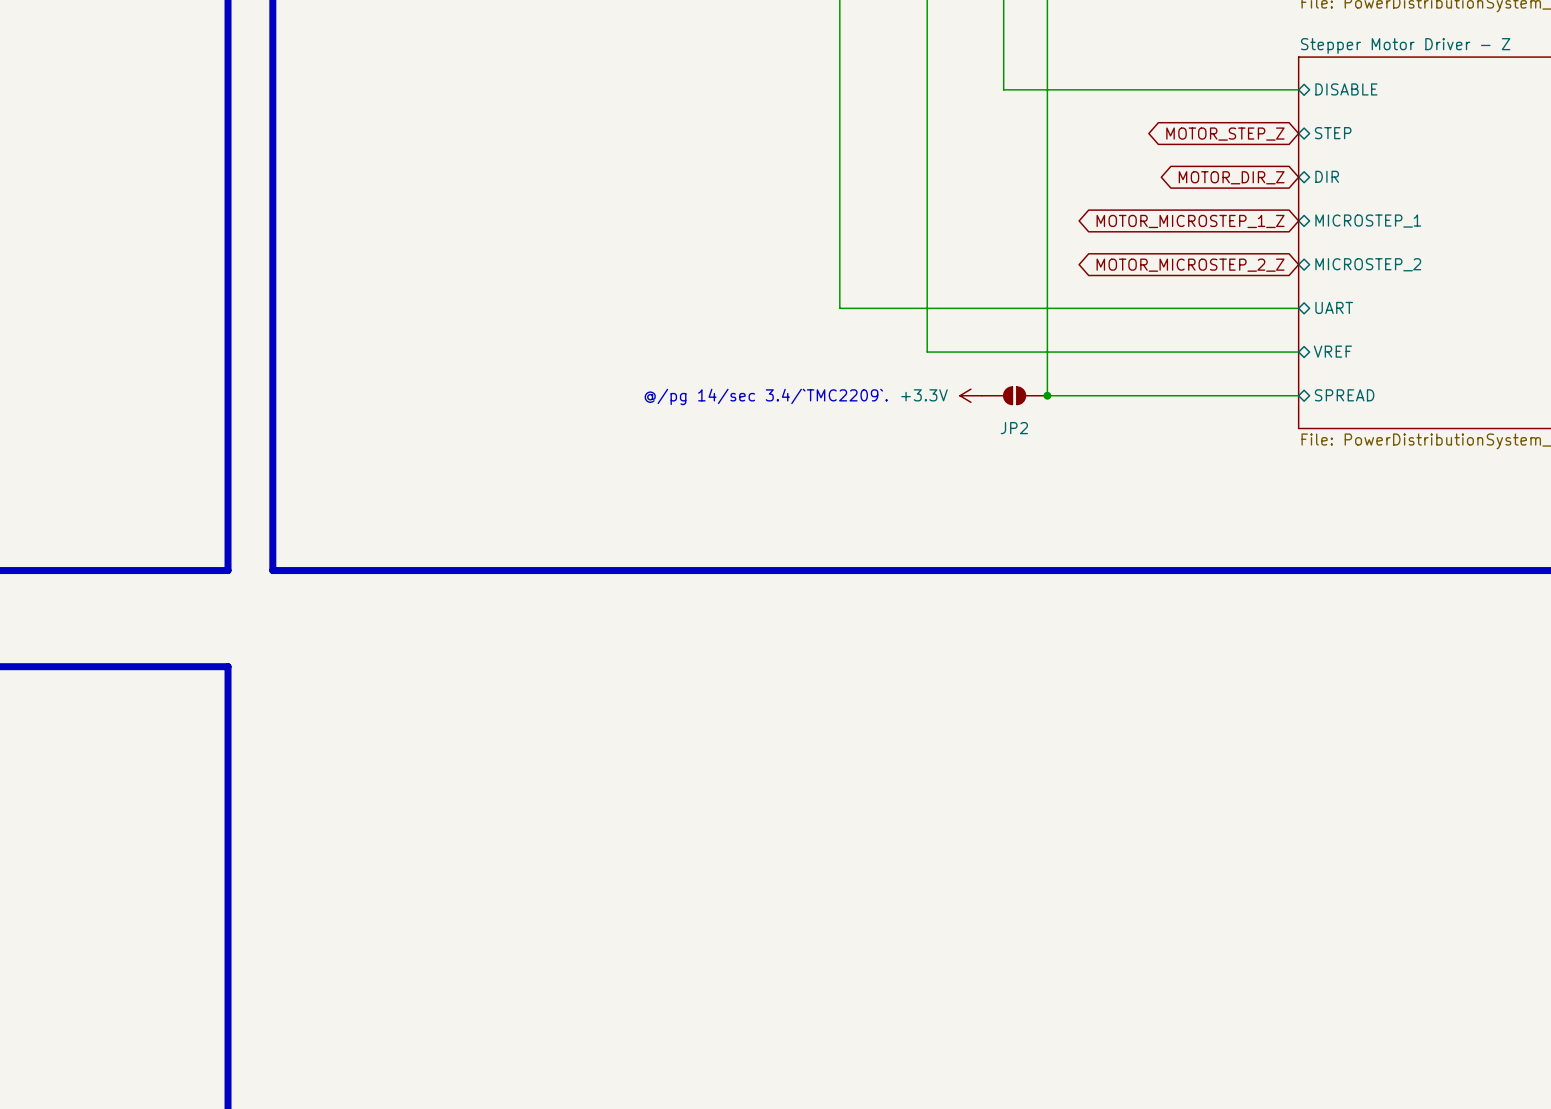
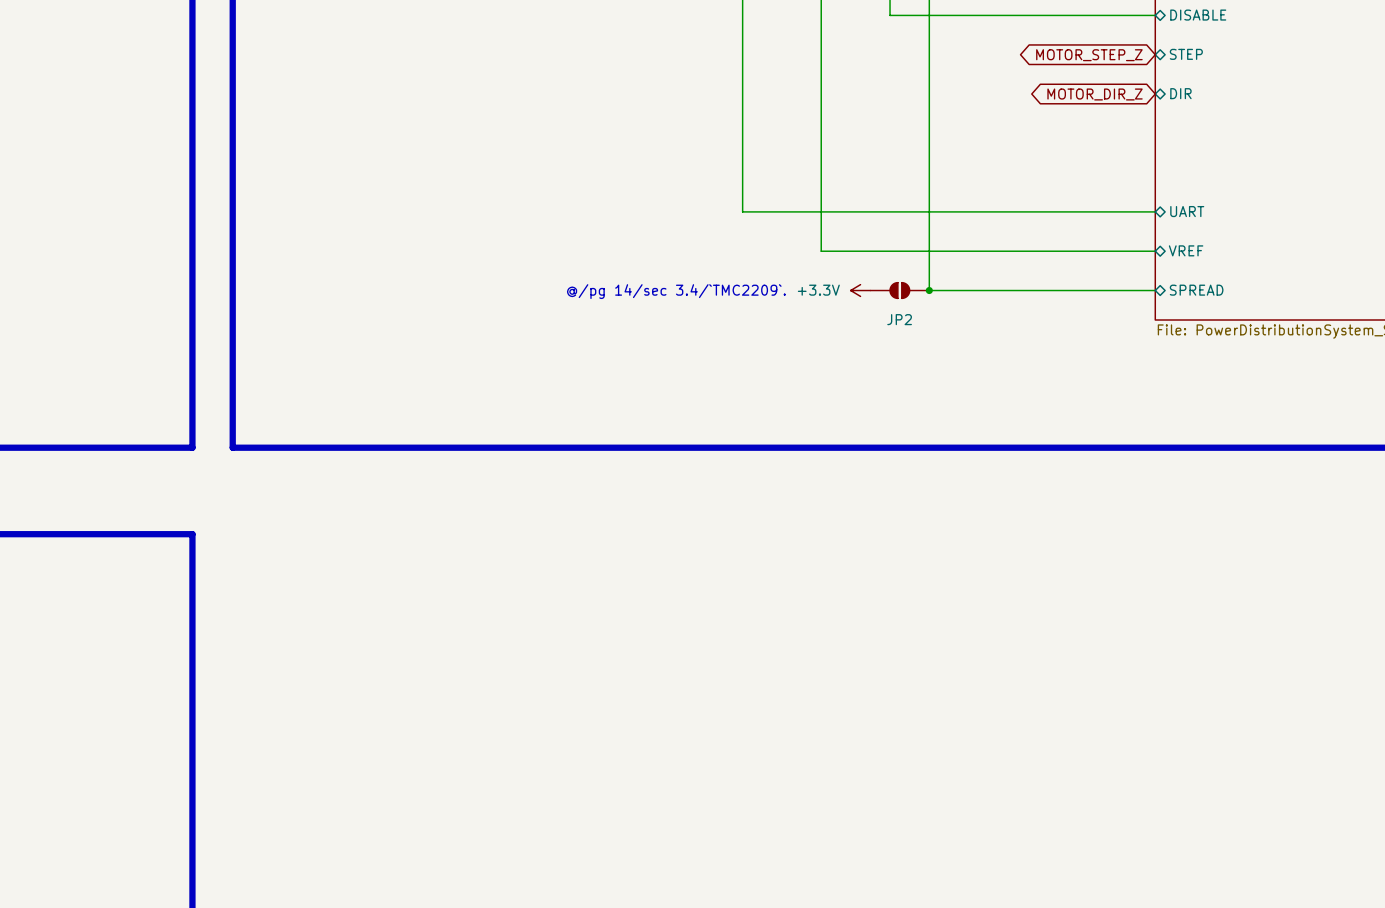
global label: MOTOR_MICROSTEP_1_Z (1190, 221) -> none
sheet pin: MICROSTEP_1 (1368, 221) -> none
sheet pin: MICROSTEP_2 (1368, 264) -> none
global label: MOTOR_MICROSTEP_2_Z (1190, 265) -> none

